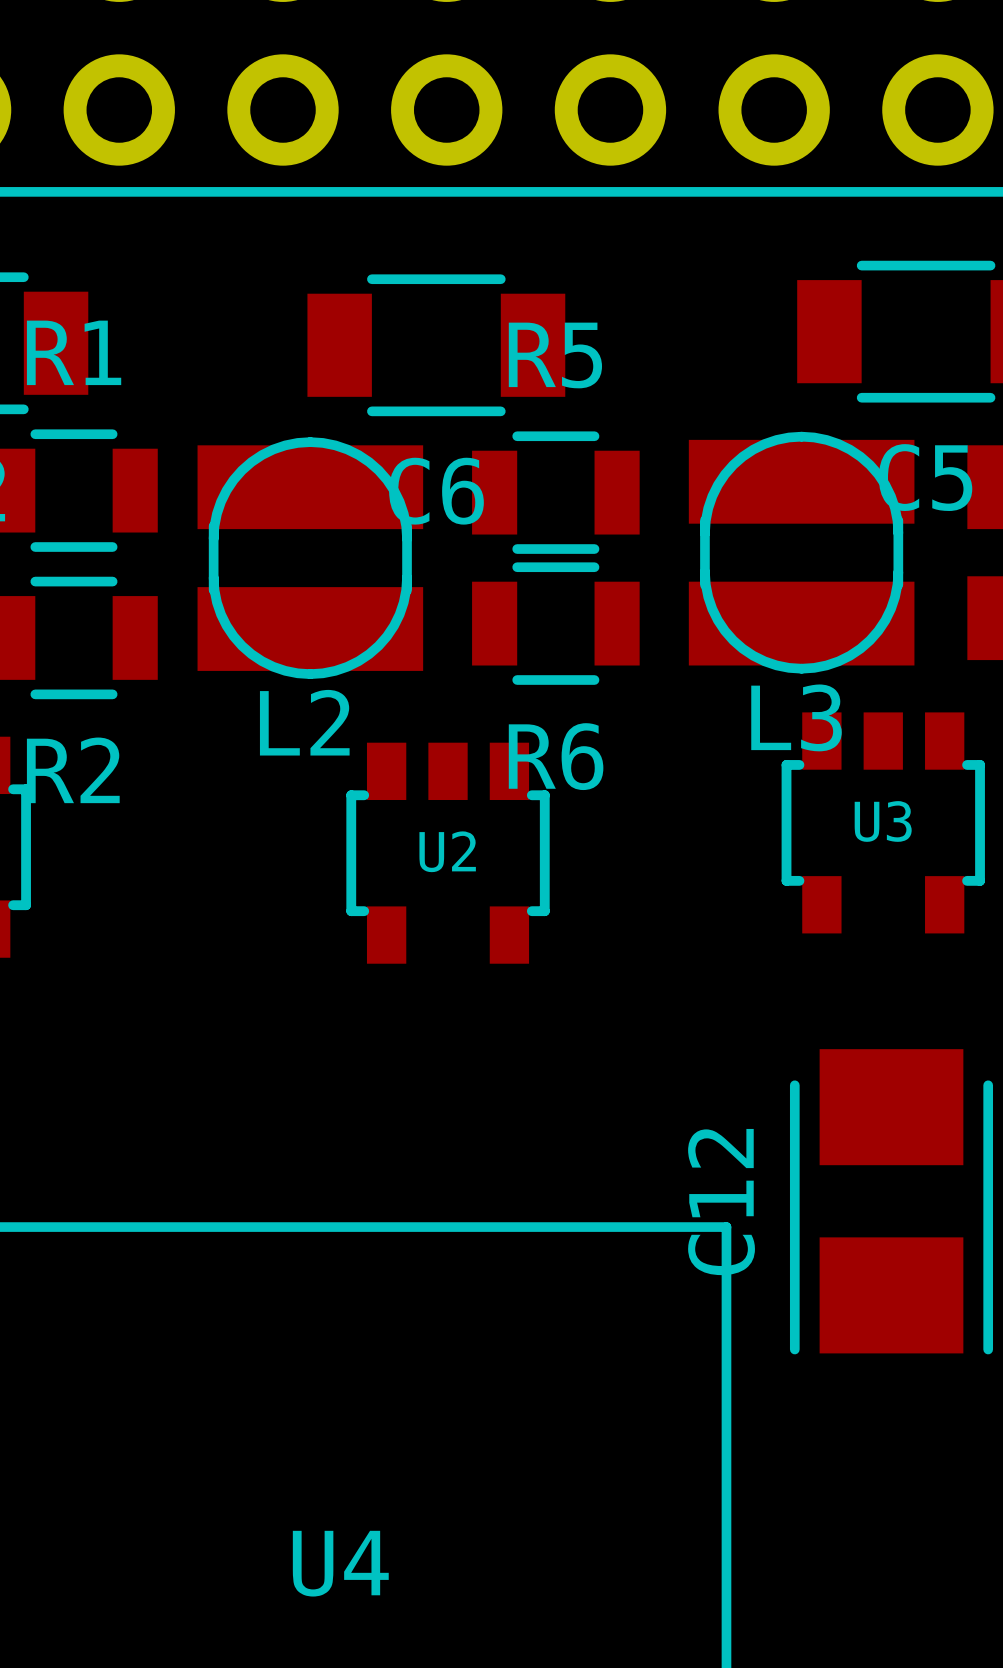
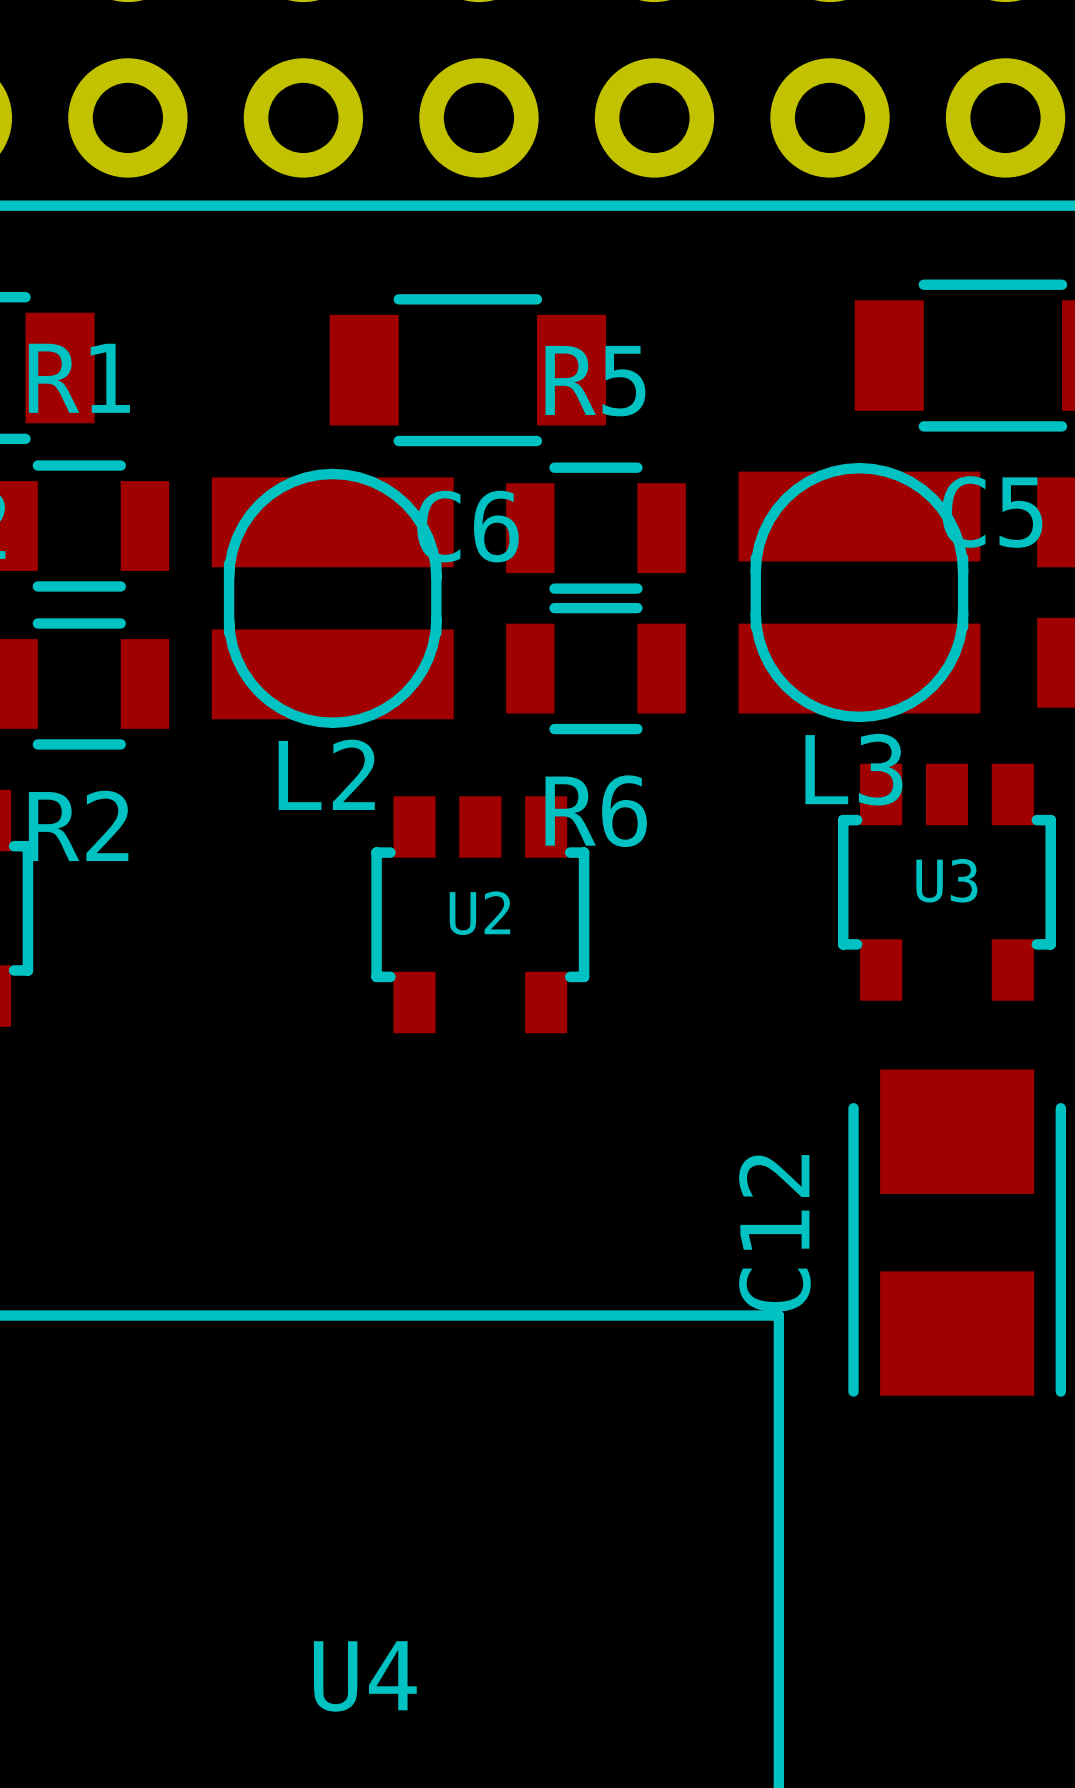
C12 position: (891, 1201) -> (957, 1233)

